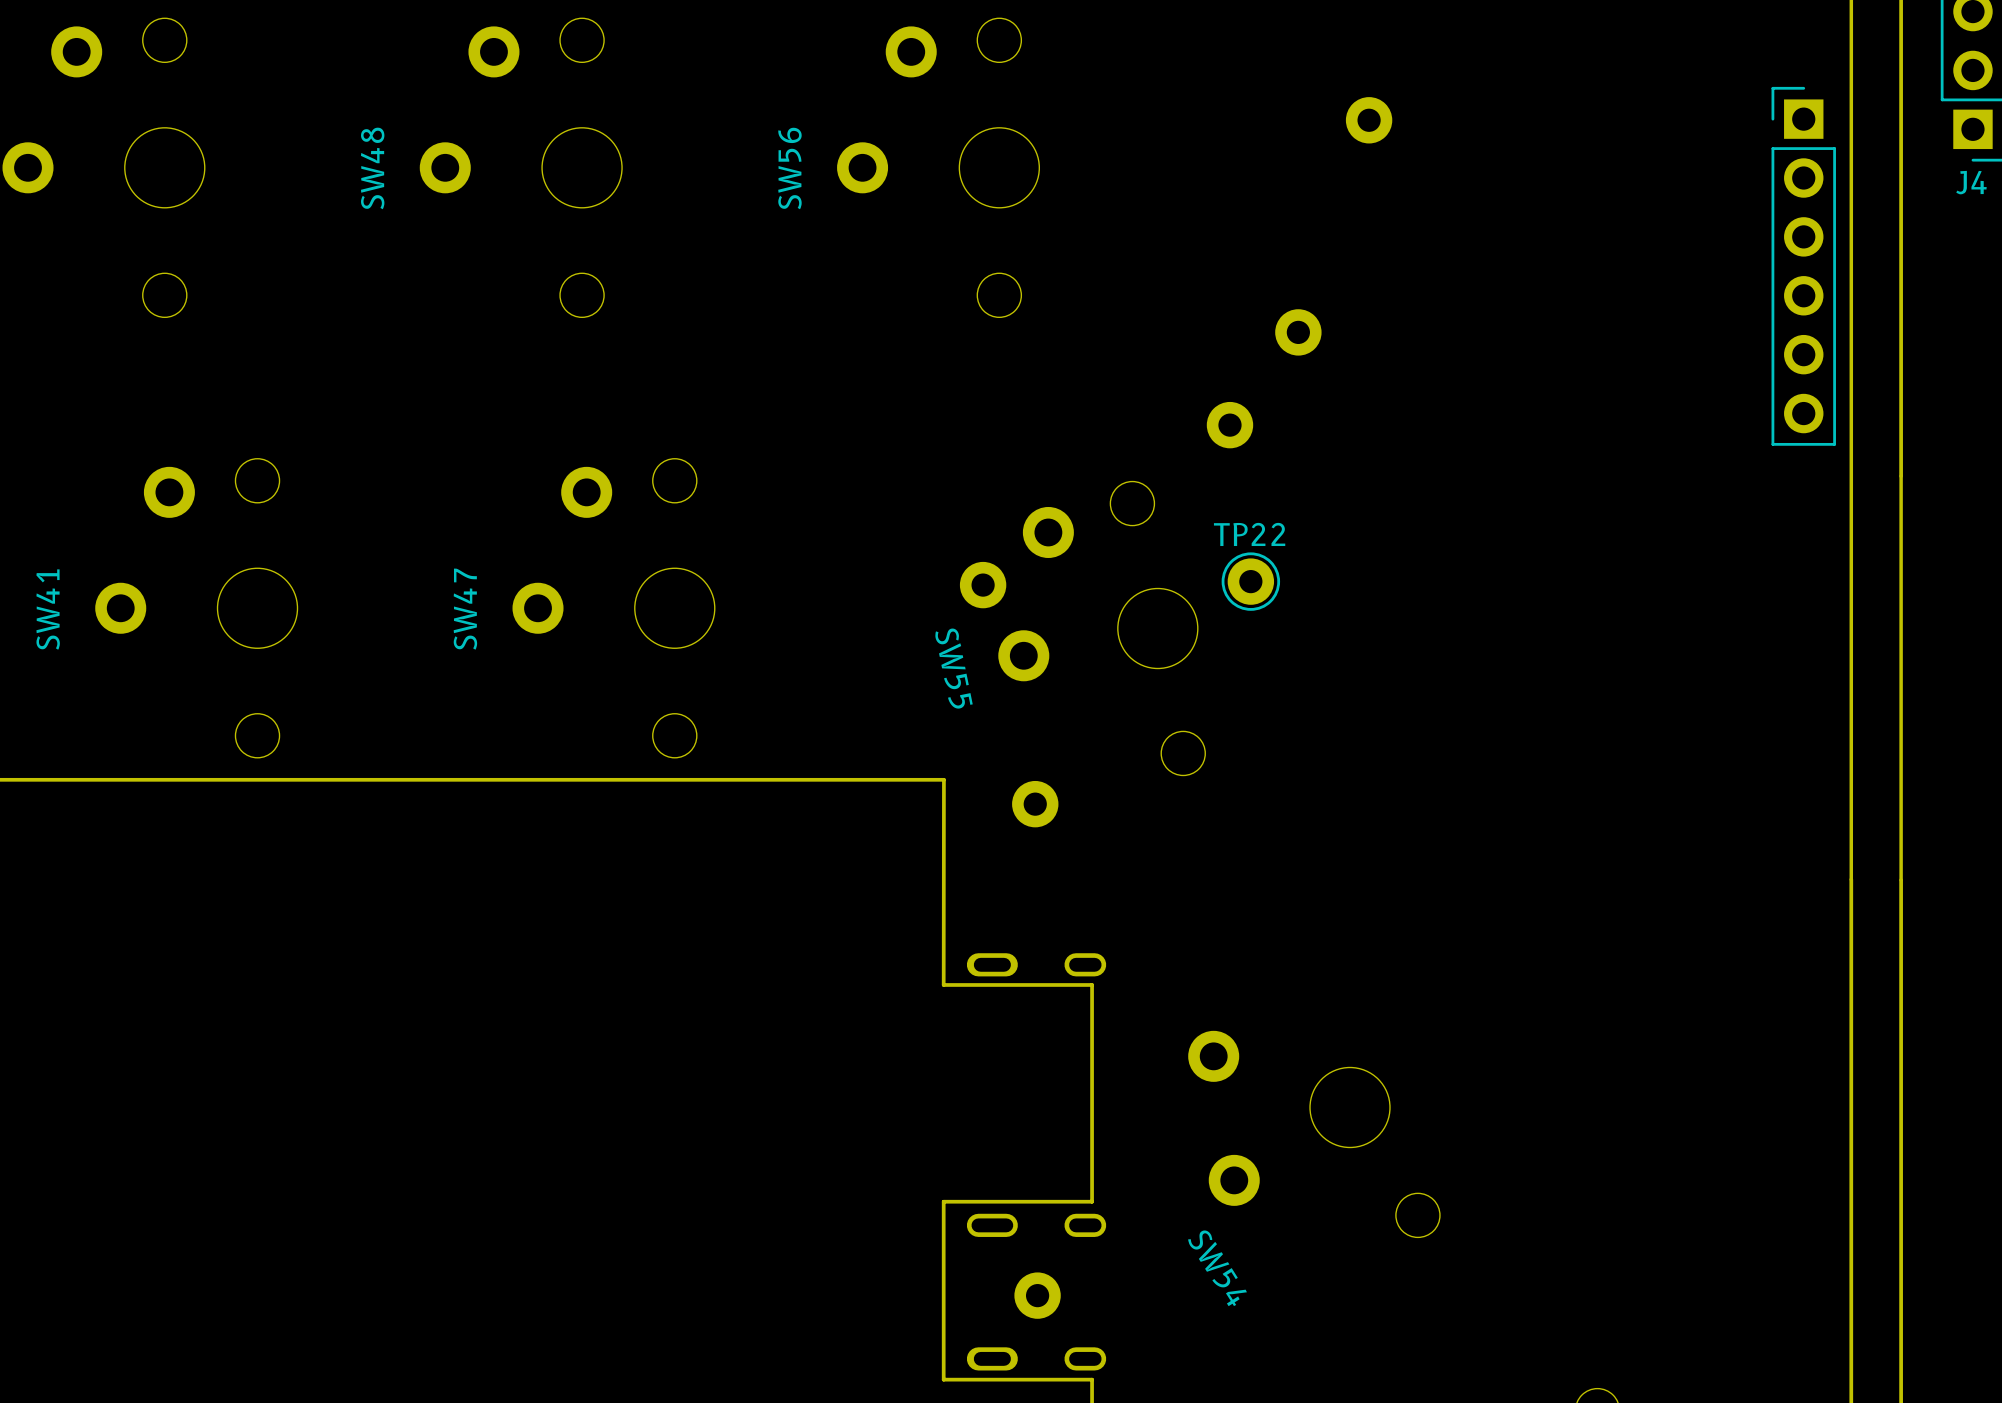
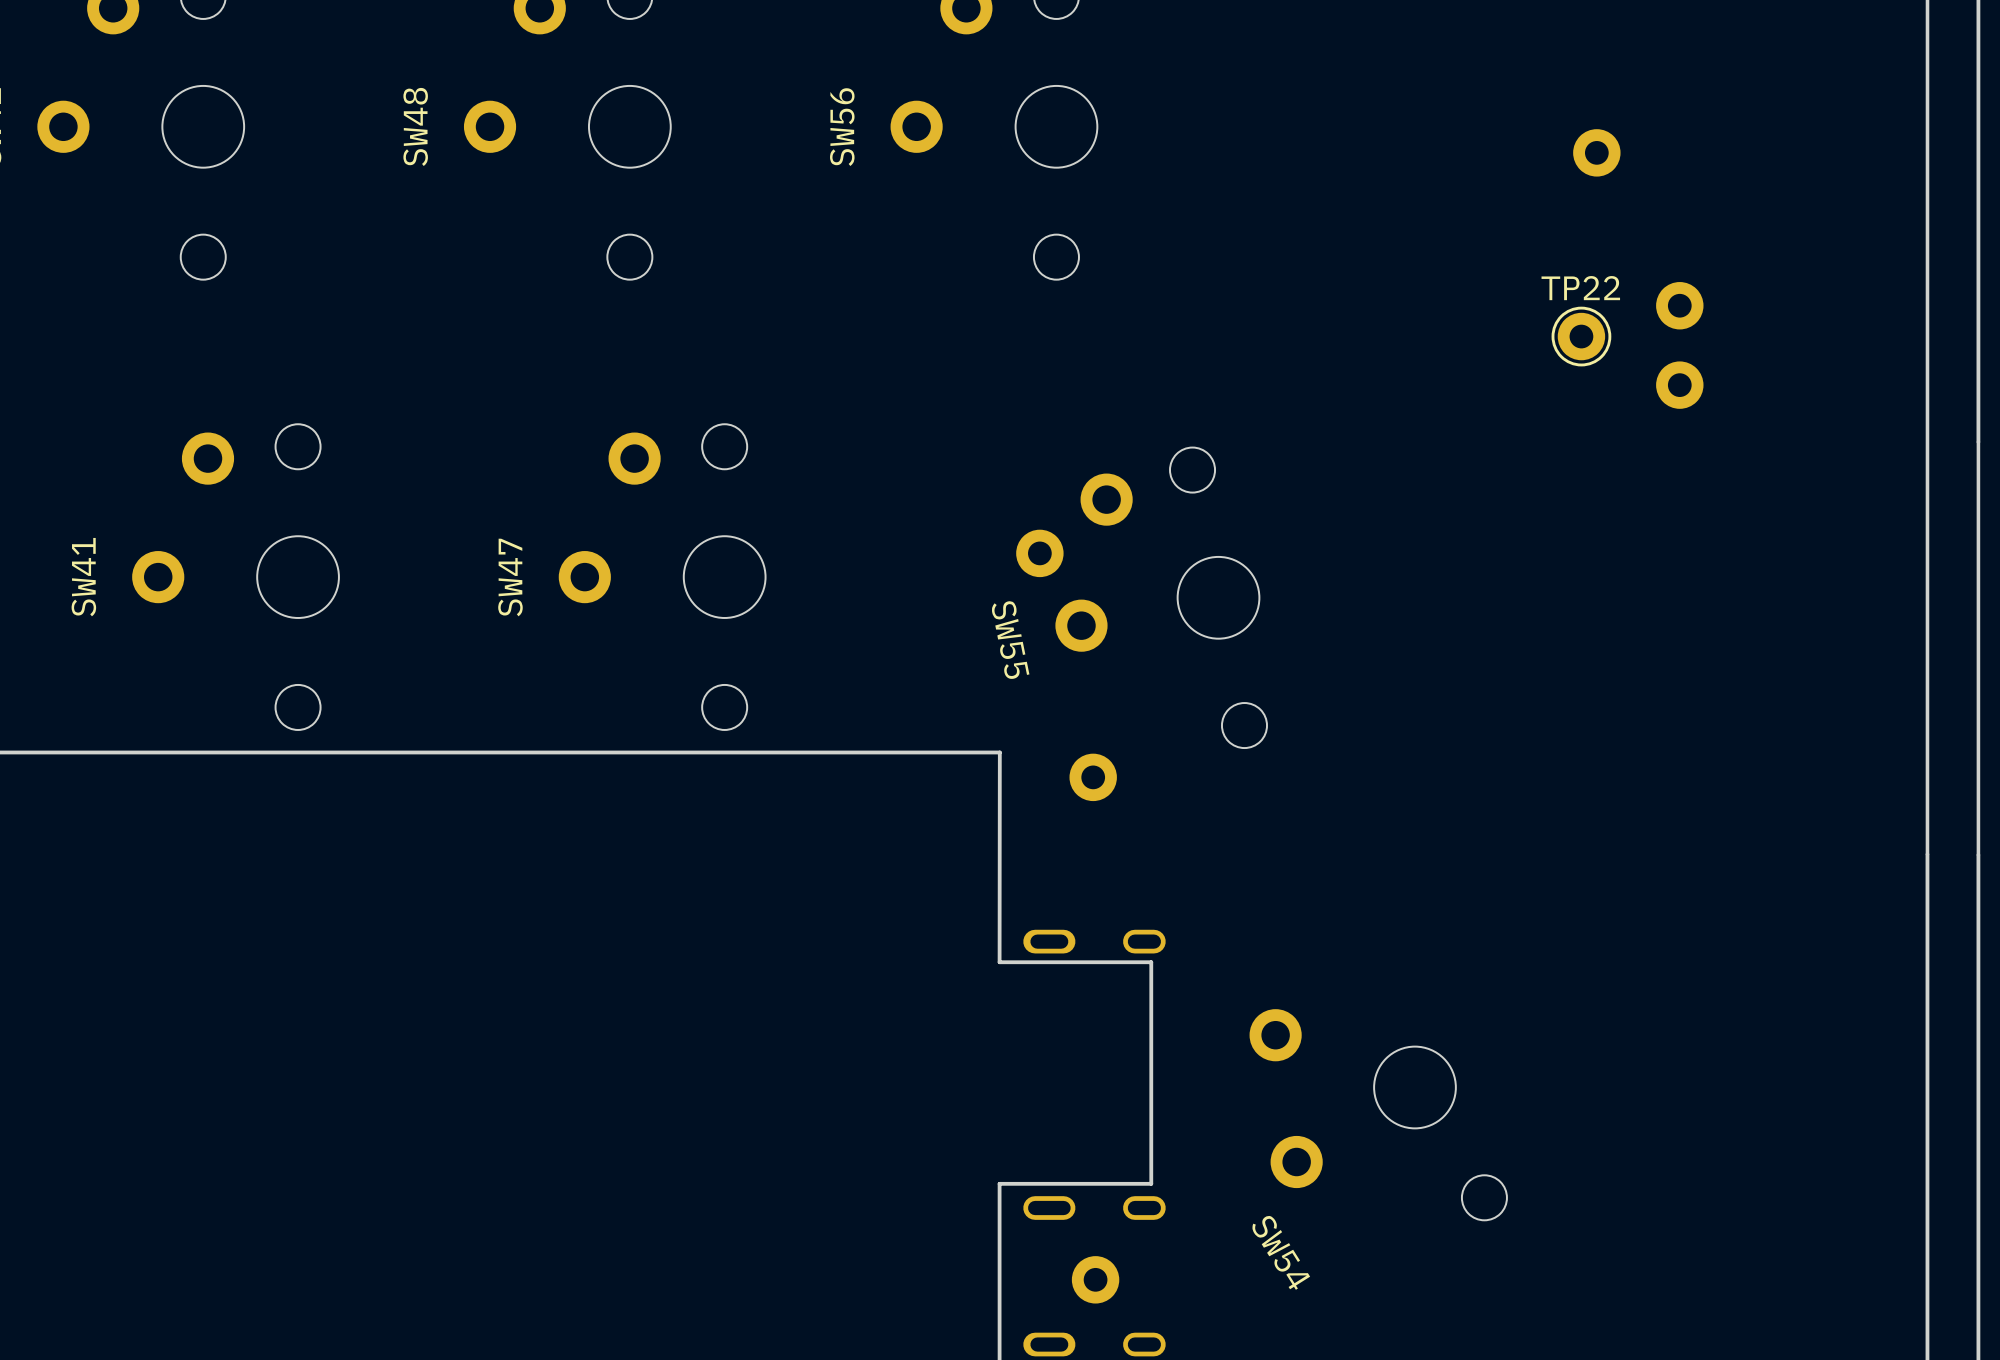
part: (1369, 120) -> none
part: none -> (1596, 152)
part: (1803, 266) -> none
part: (1298, 332) -> none
part: none -> (1679, 305)
part: none -> (1679, 385)
part: (1229, 425) -> none
TP22 position: (1250, 581) -> (1581, 336)

